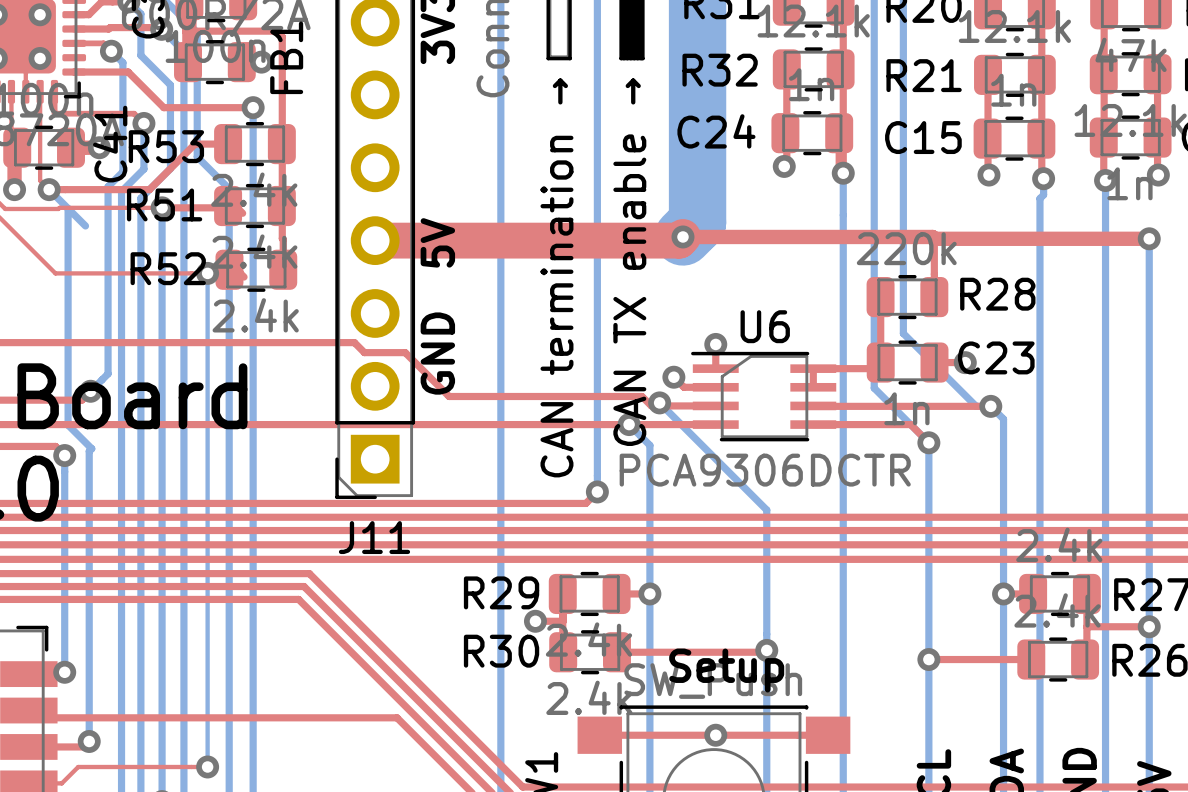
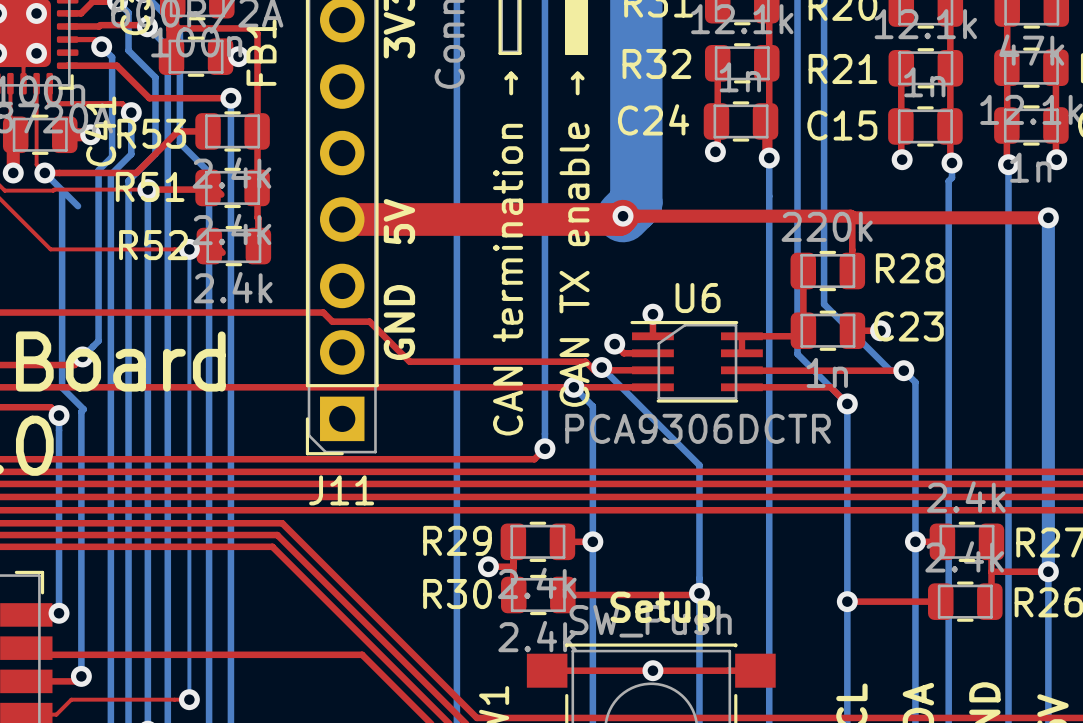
bottom track width: thin (1149, 238) (1149, 626) -> thick (1048, 217) (1048, 571)

